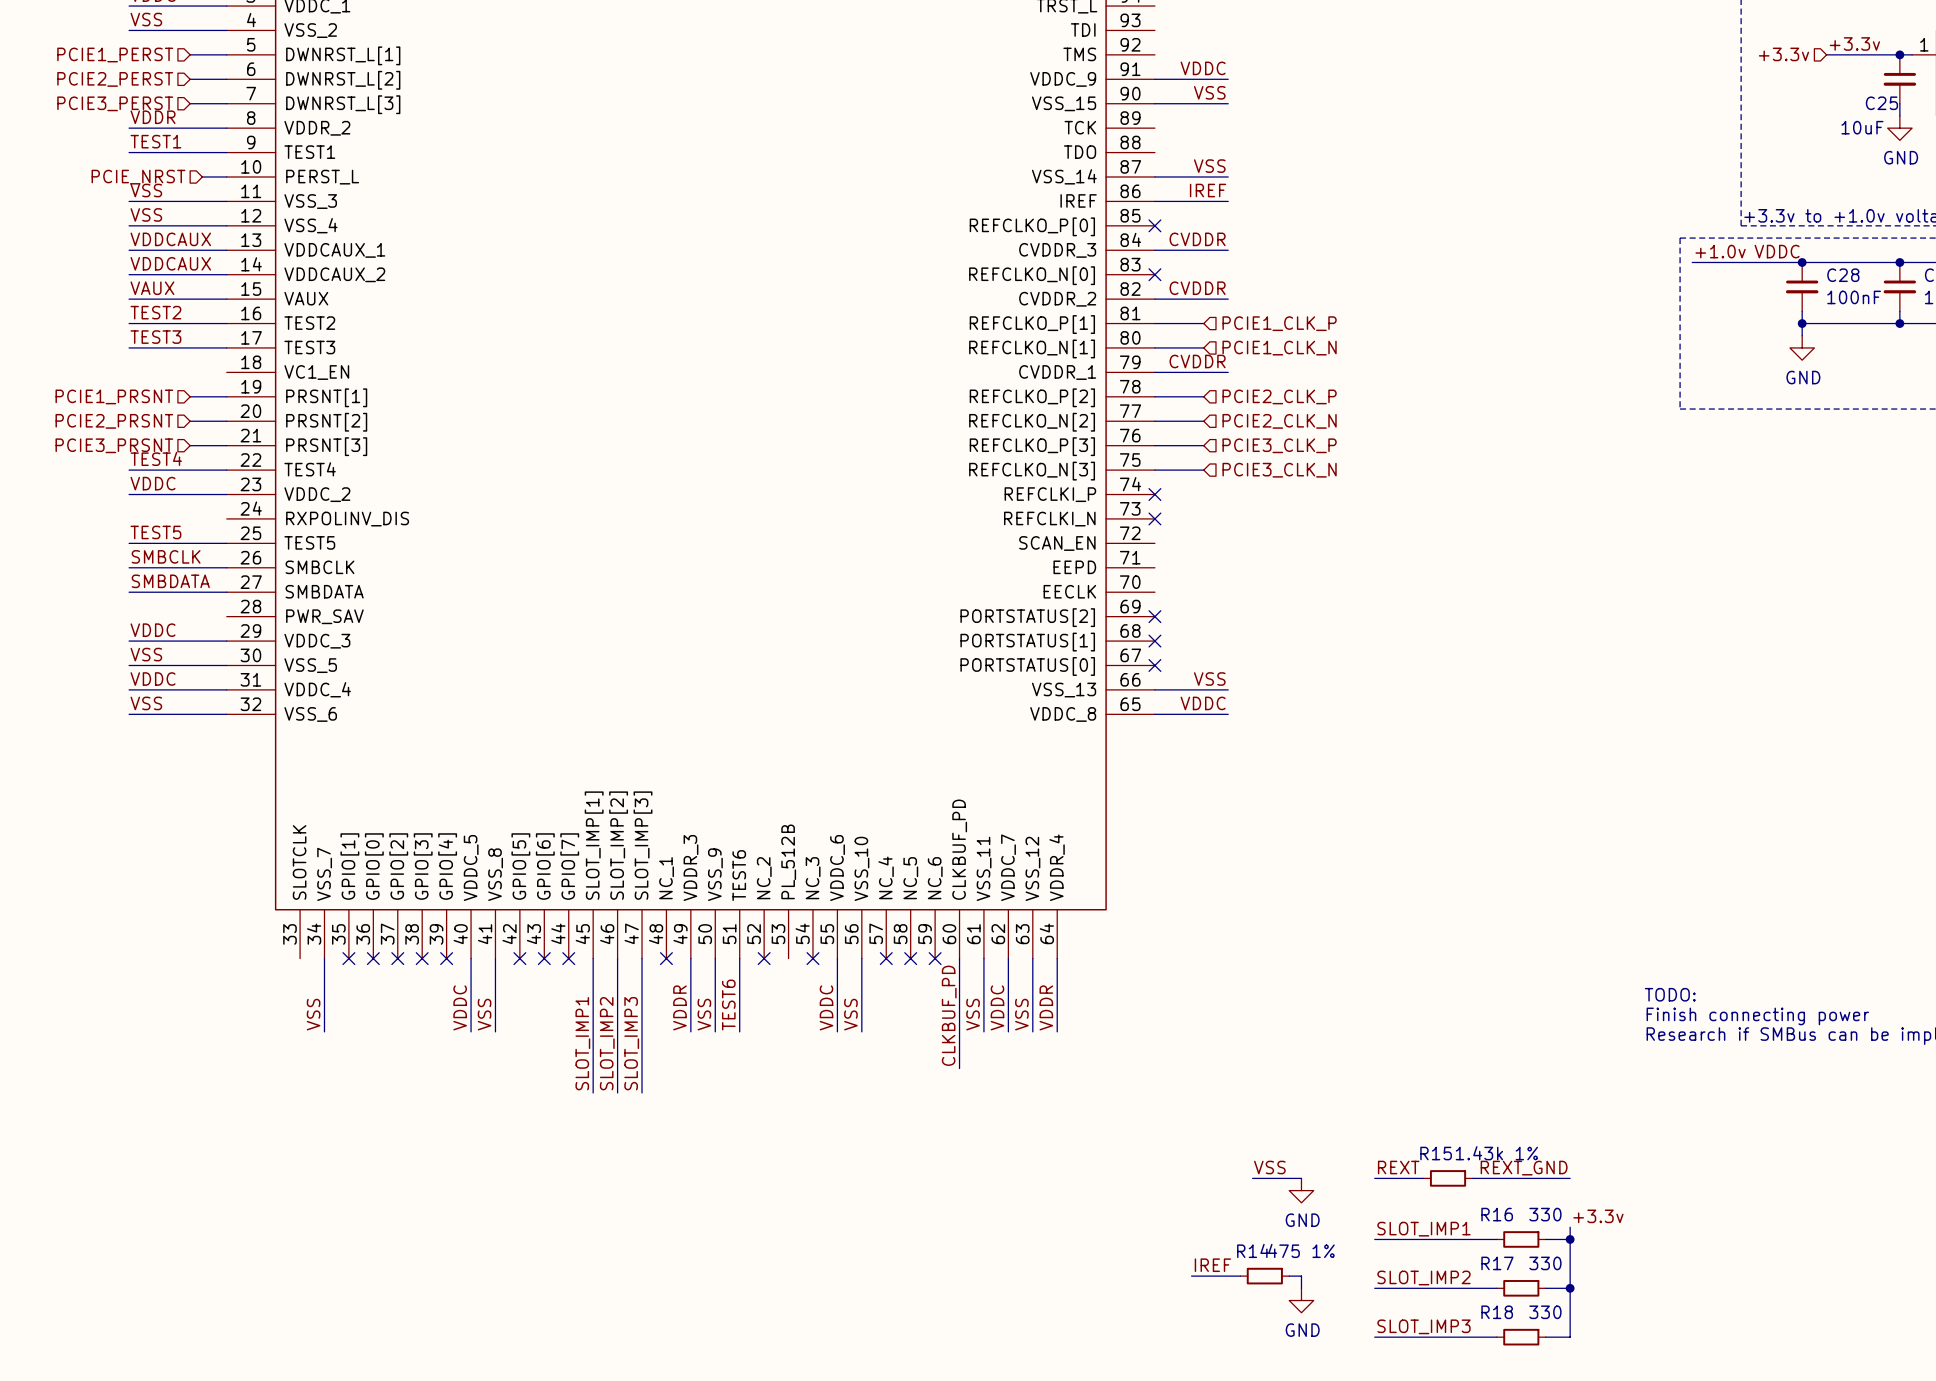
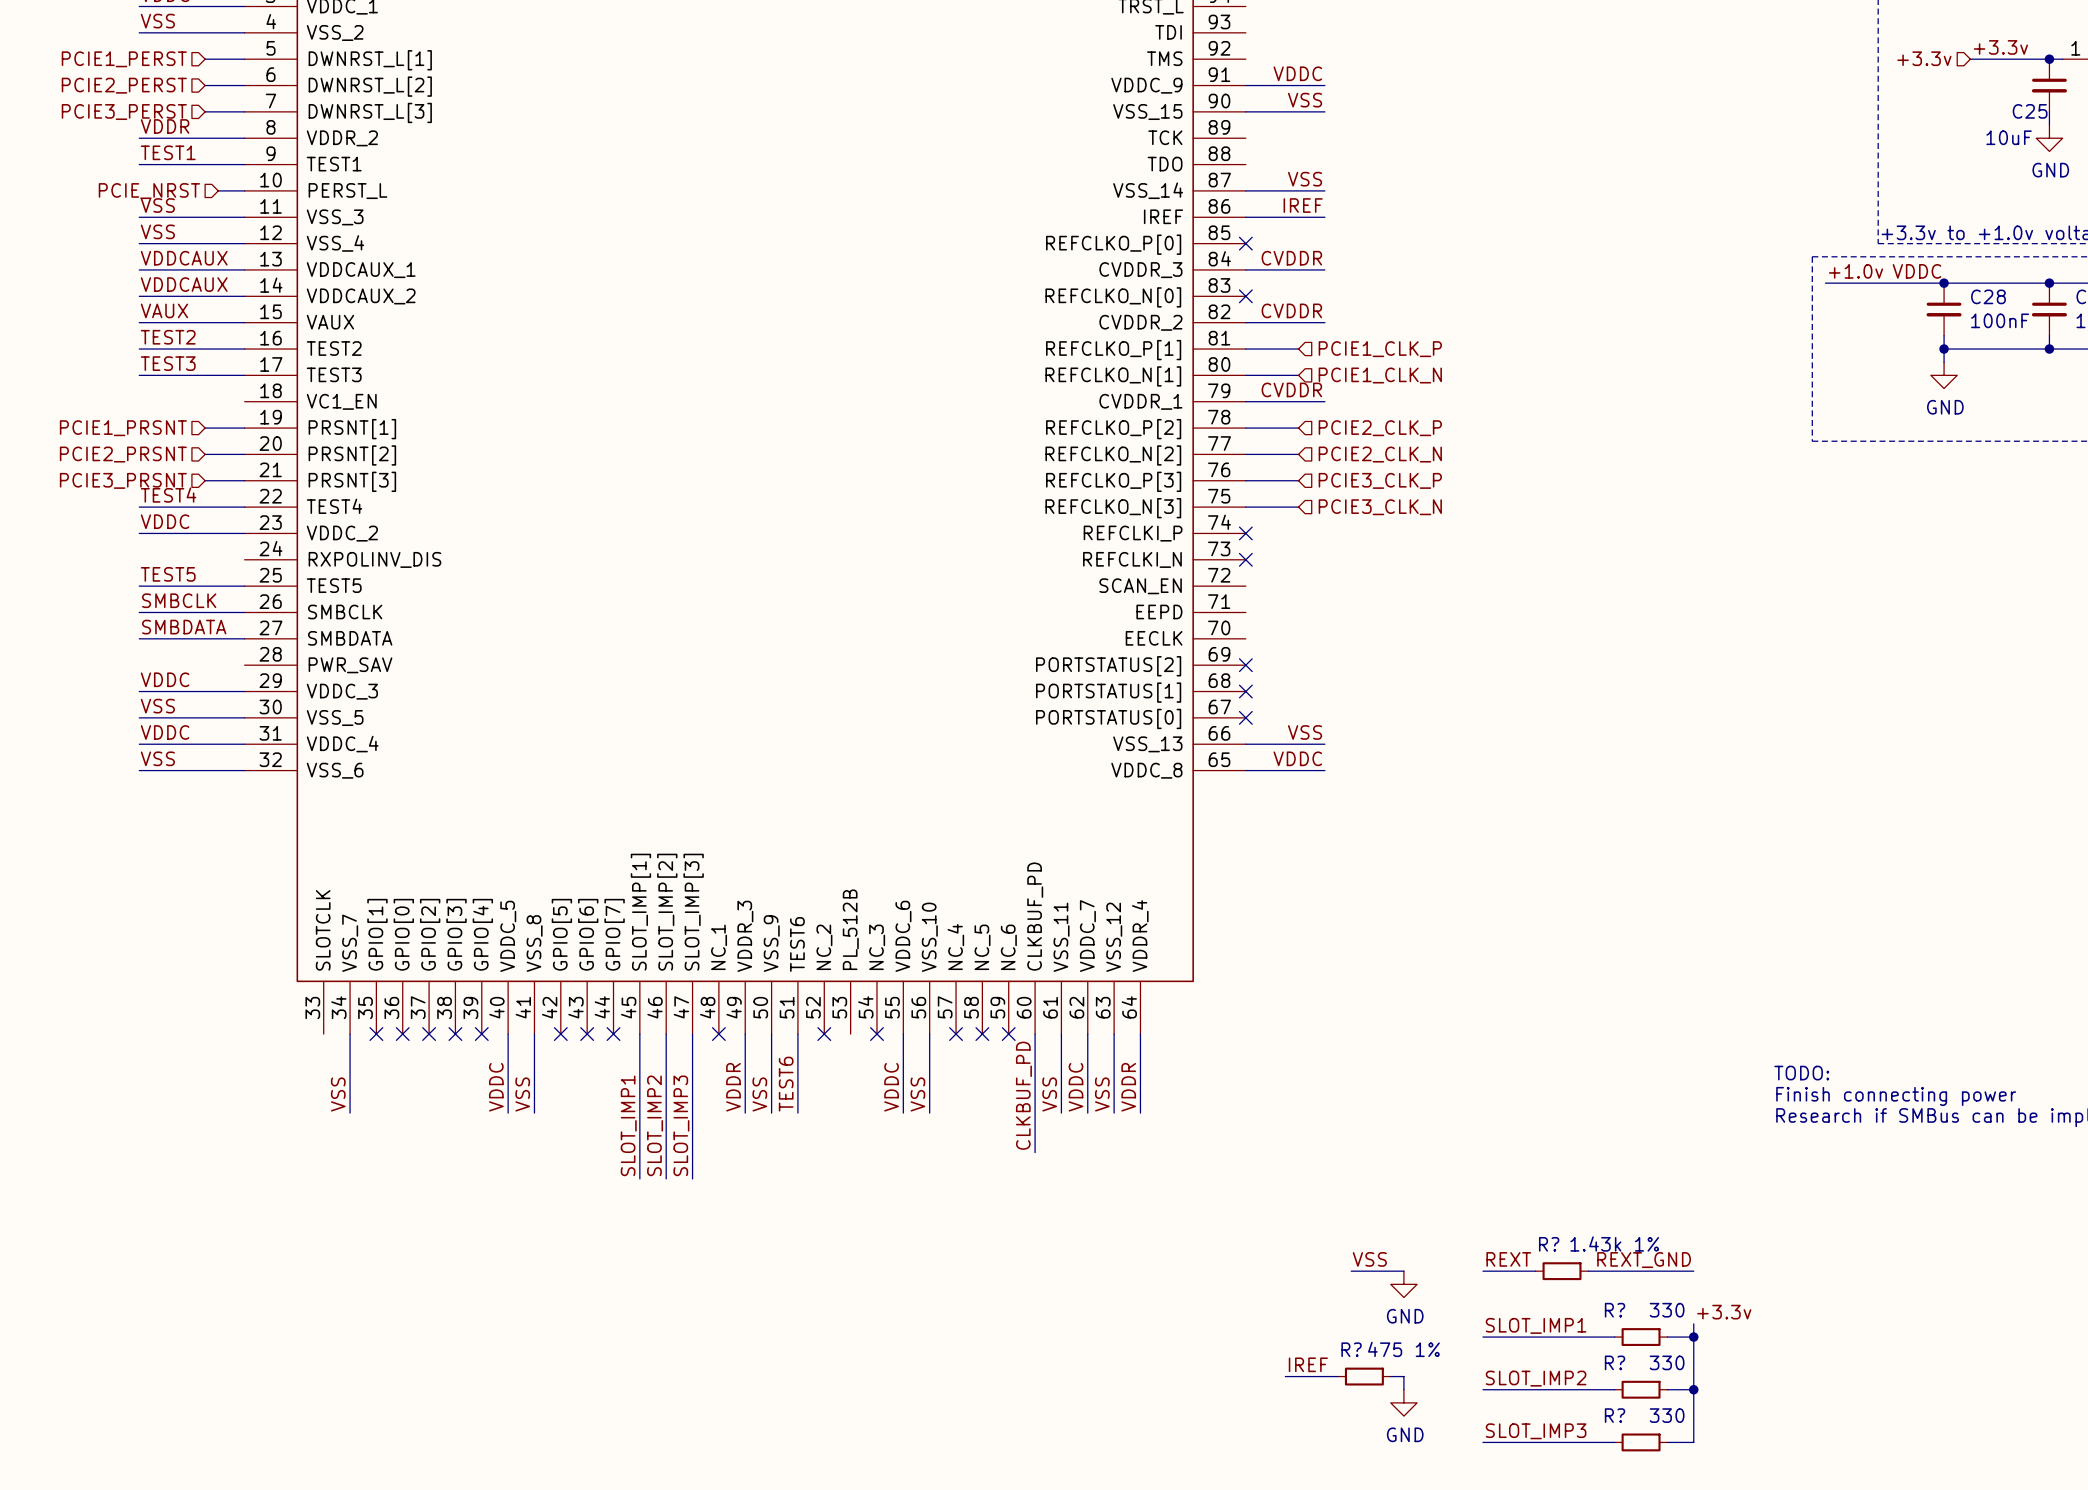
R15 name: R15 (1436, 1153) -> R? (1549, 1244)
R16 name: R16 (1497, 1214) -> R? (1615, 1310)
R14 name: R14 (1253, 1250) -> R? (1351, 1349)
R17 name: R17 (1497, 1263) -> R? (1615, 1362)
R18 name: R18 (1497, 1312) -> R? (1615, 1415)

